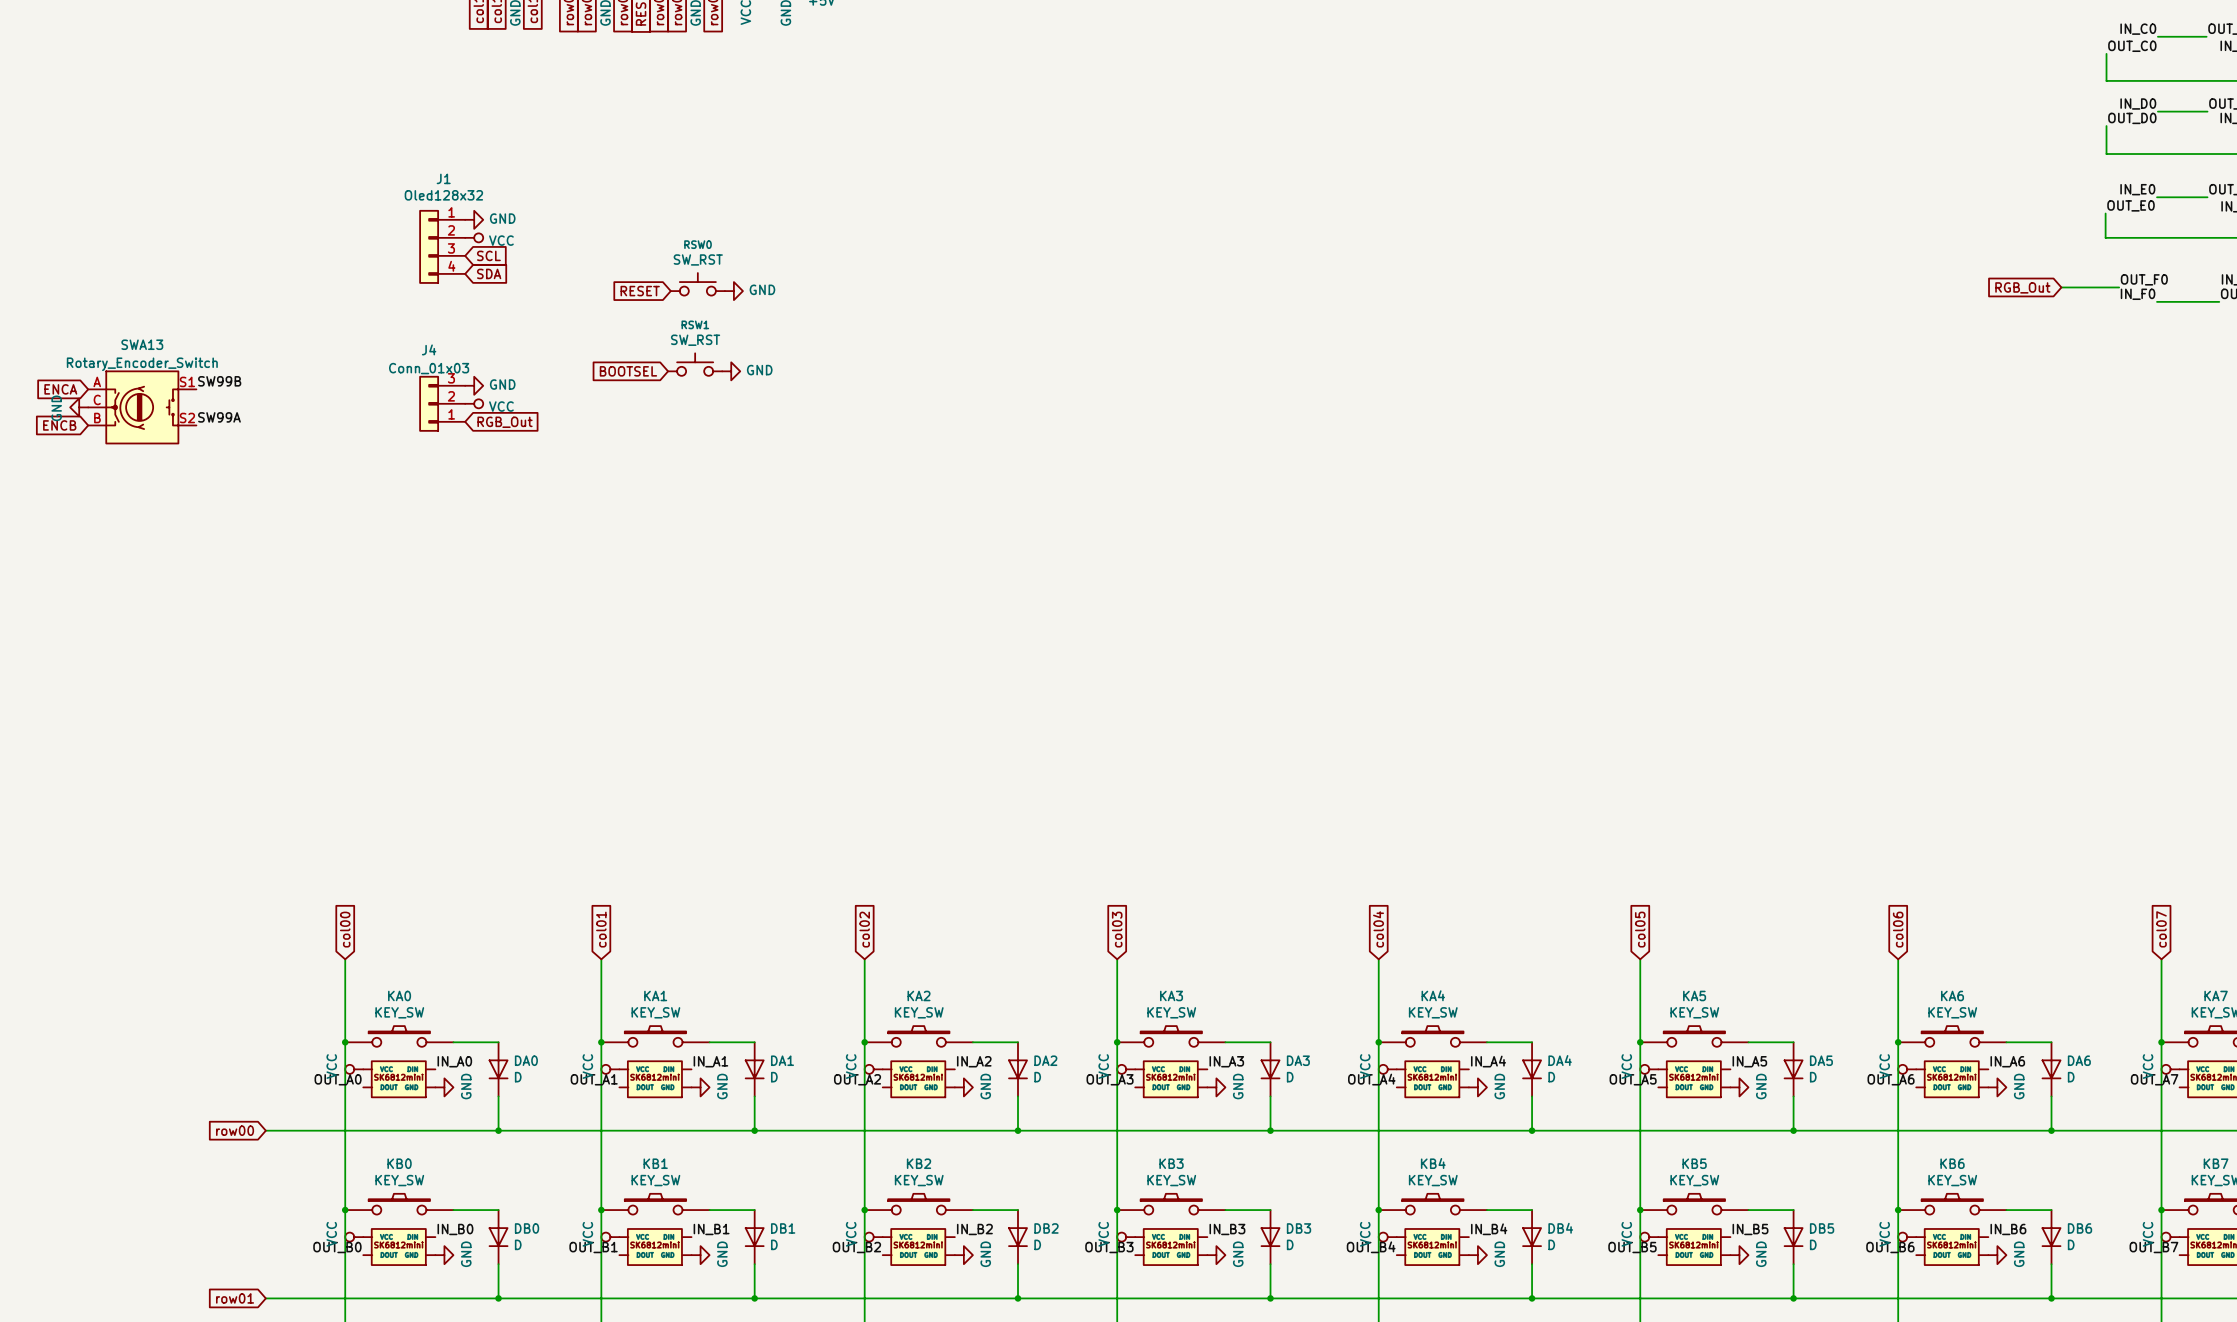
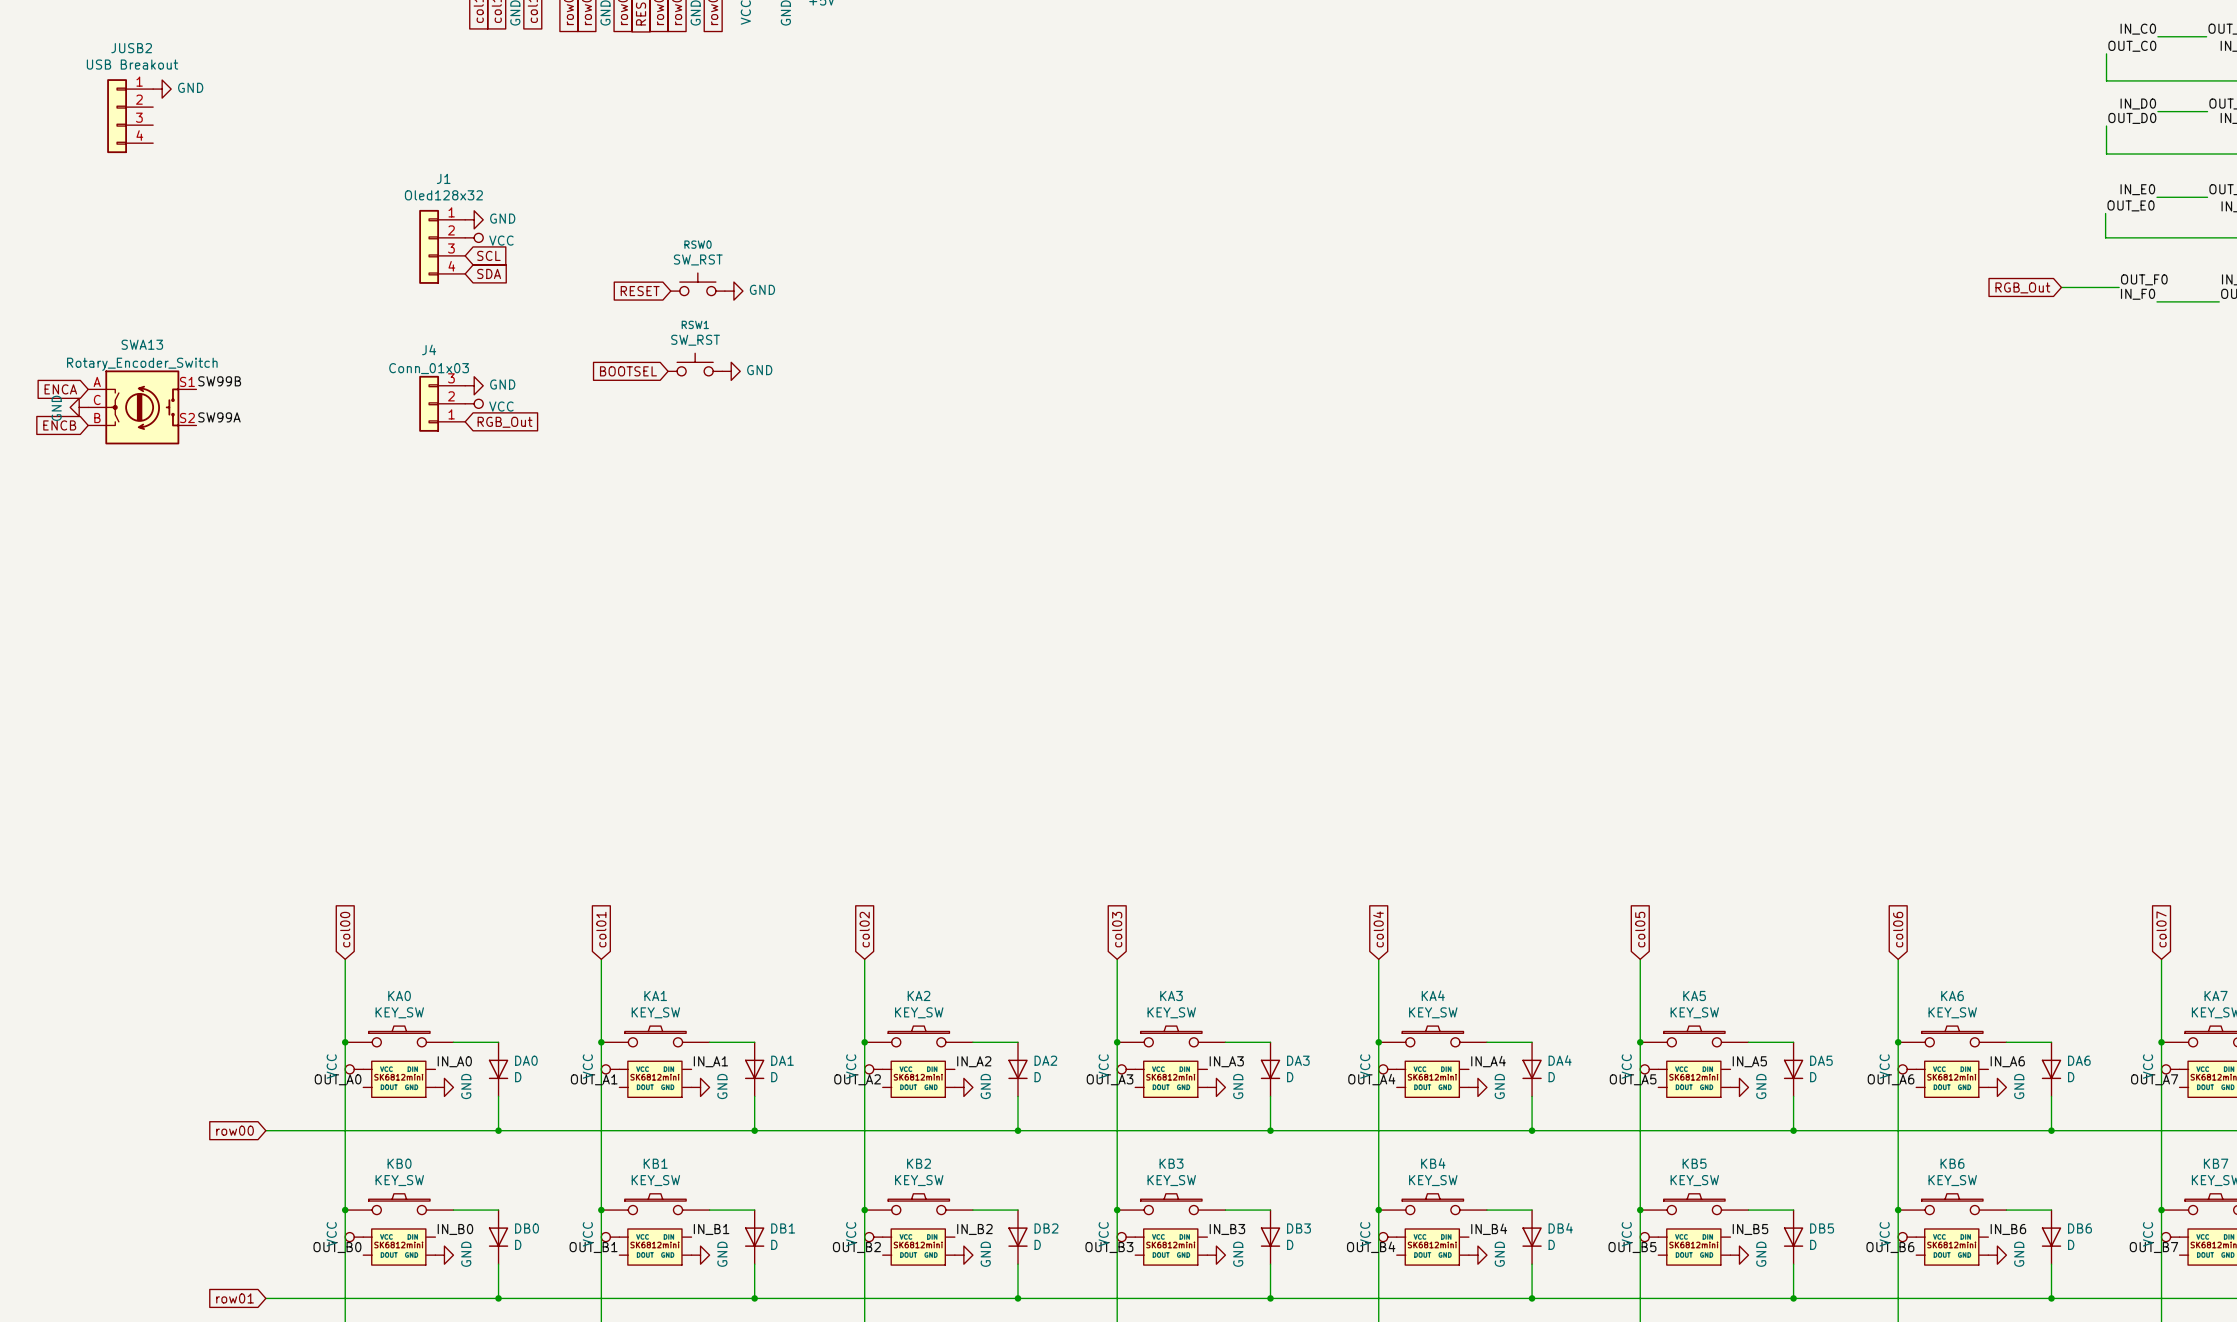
power symbol: none -> GND (162, 89)
JUSB2: none -> USB Breakout (130, 116)
SWA13 symbol: [88, 370, 197, 445] -> [88, 370, 197, 445]

